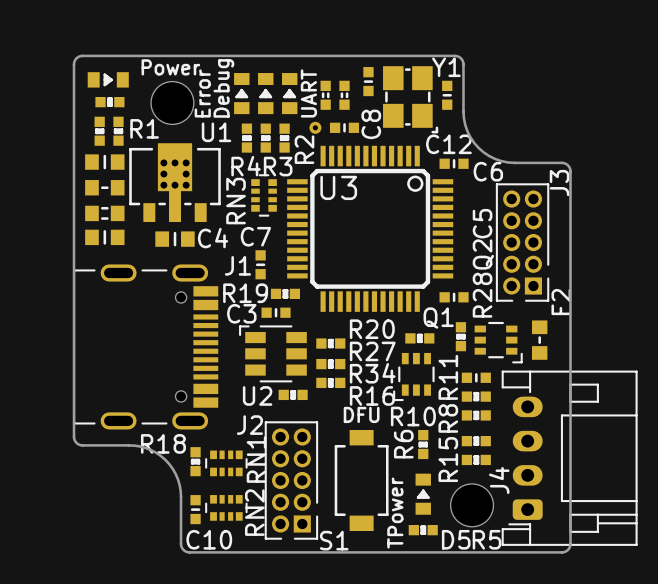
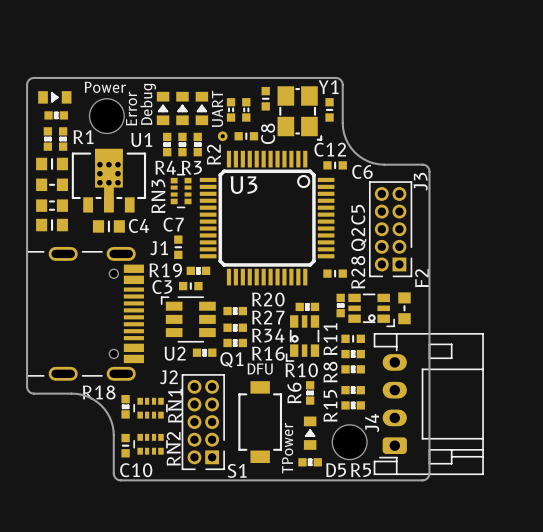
Q1 name position: Q1 (438, 318) -> Q1 (231, 359)
Q2 footprint: [474, 321, 523, 364] -> [348, 293, 395, 328]
Q1 footprint: [393, 352, 435, 402] -> [285, 315, 320, 362]

